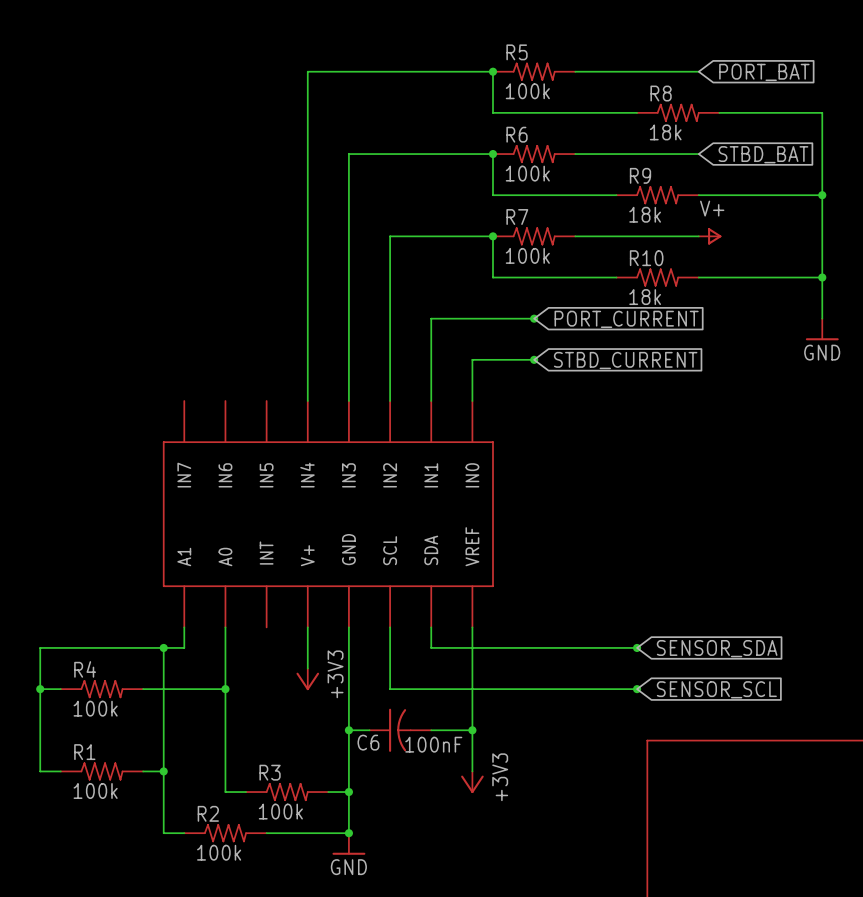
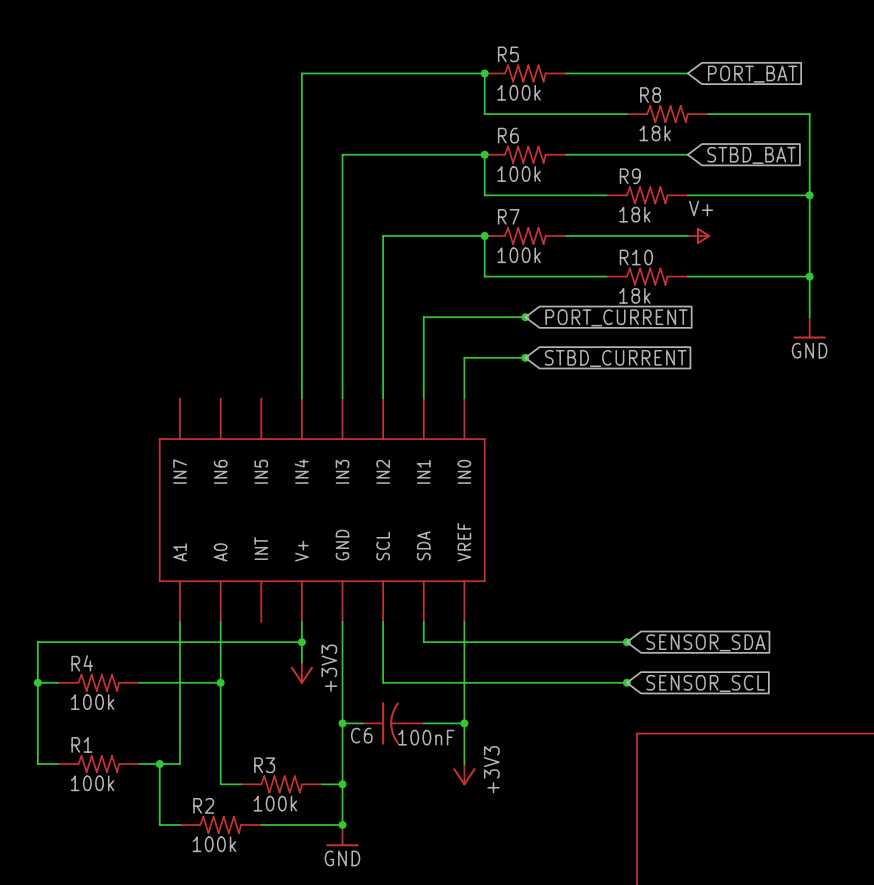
wire: (163, 647) (163, 771) -> (301, 642) (180, 642) (180, 764) (159, 764)
junction: (163, 647) -> none
junction: none -> (301, 642)

